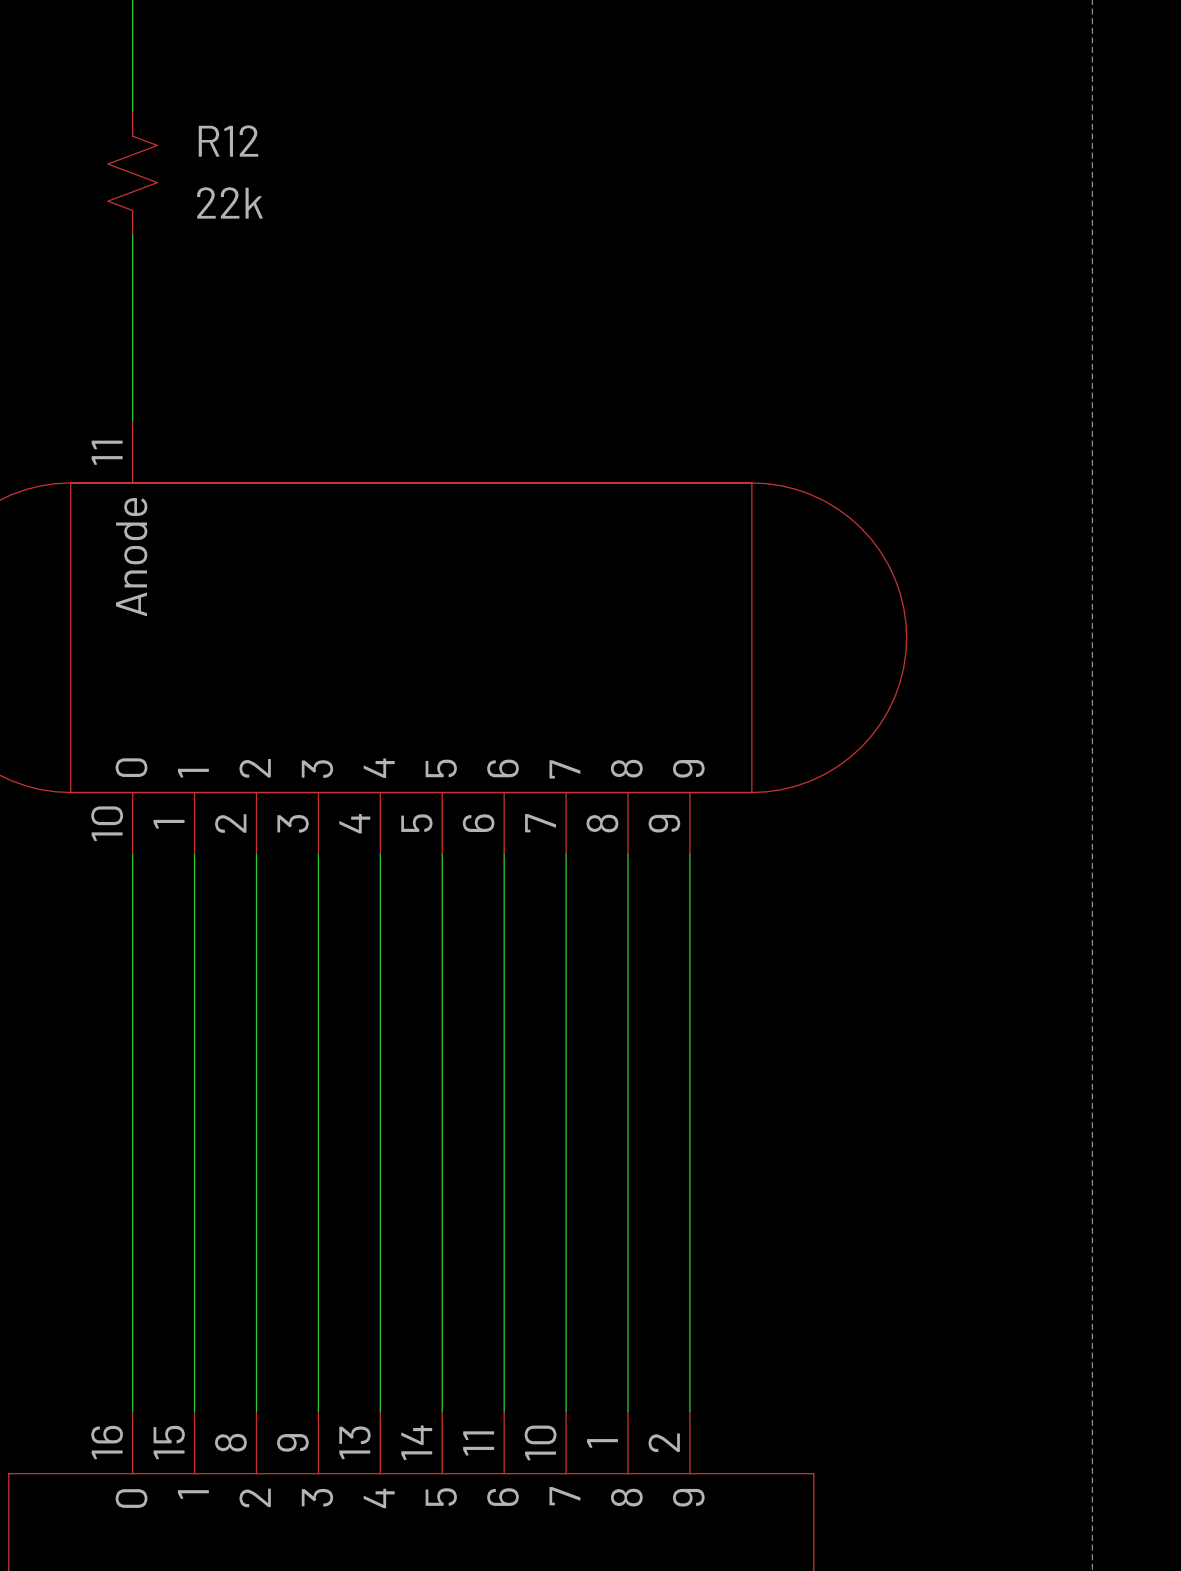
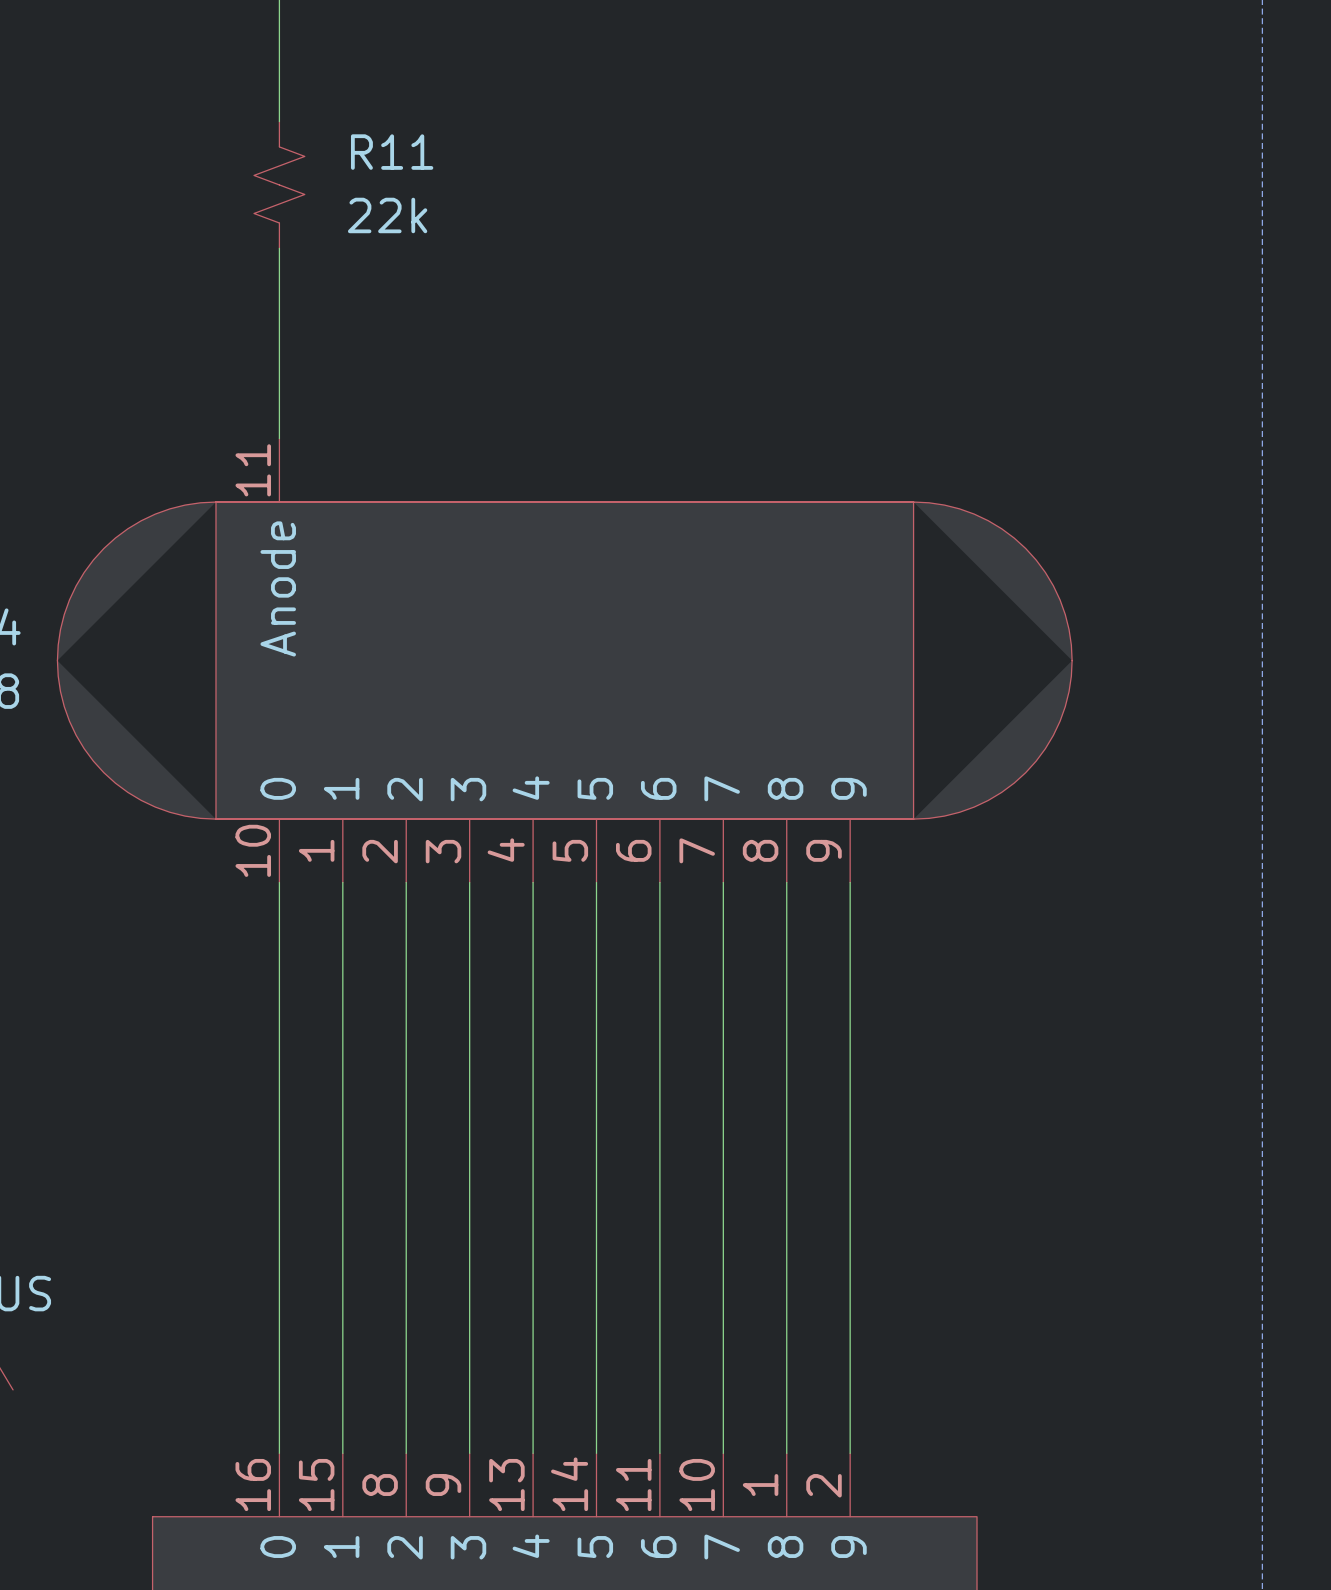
R12 name: R12 (228, 141) -> R11 (392, 152)

